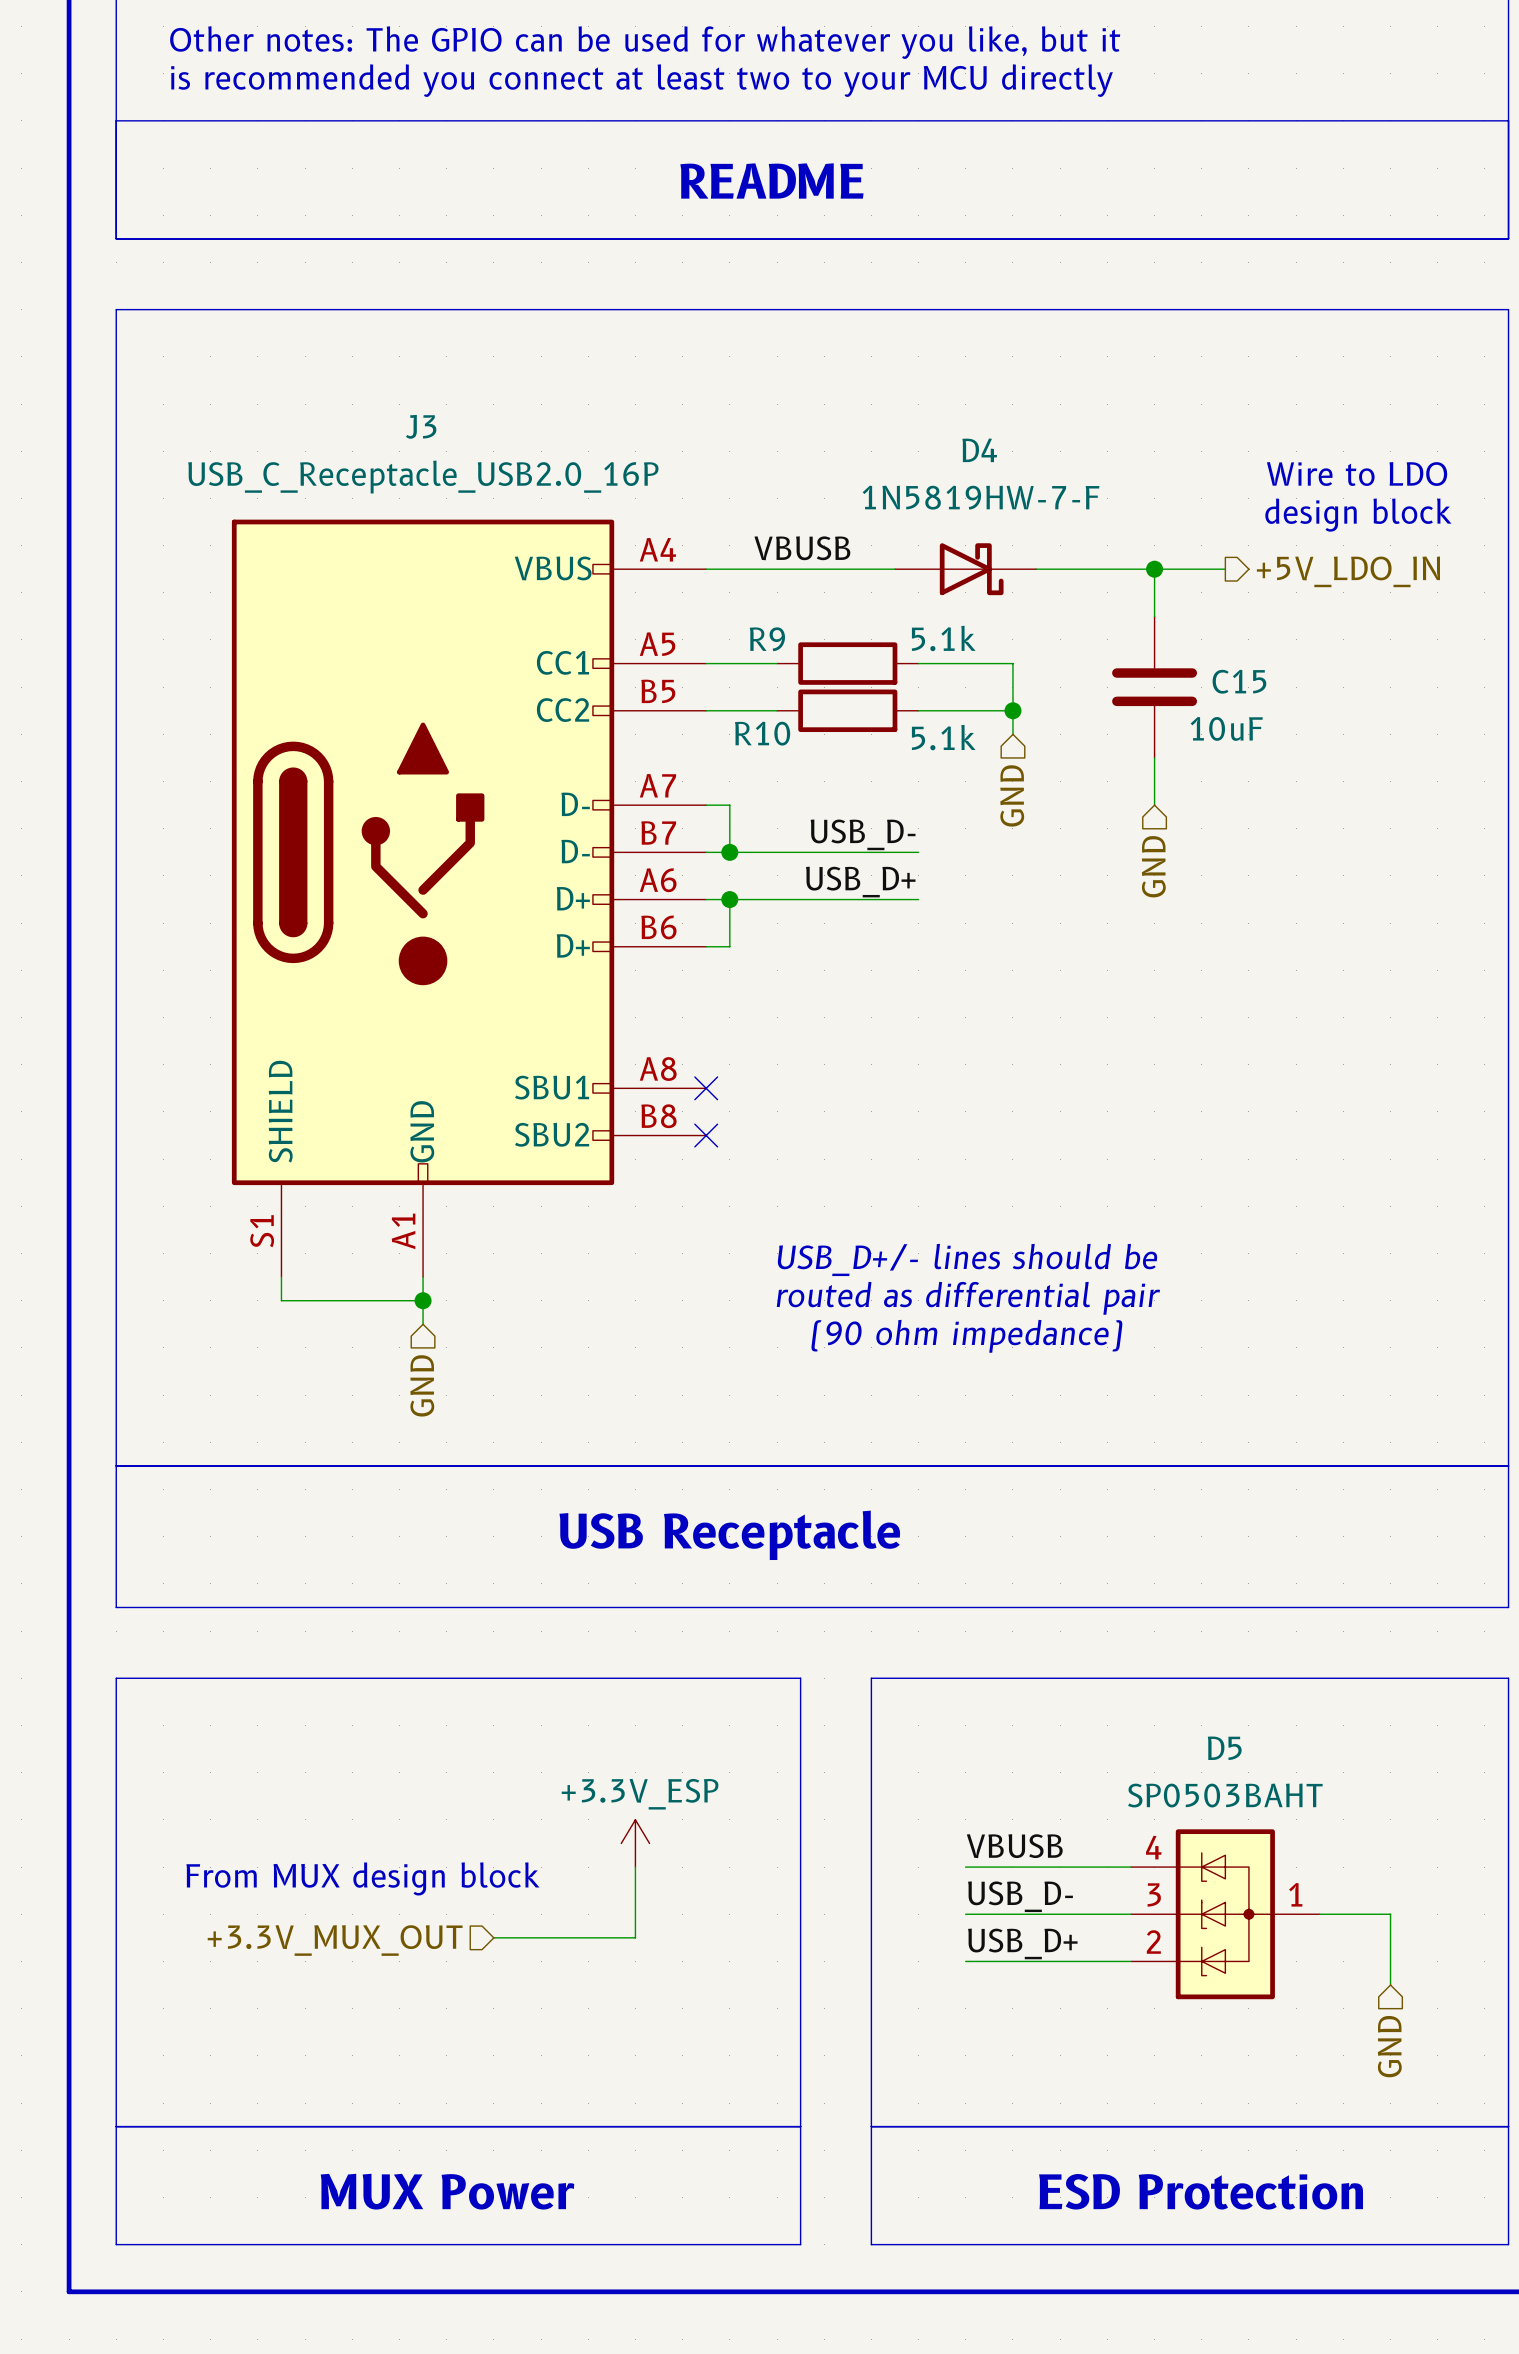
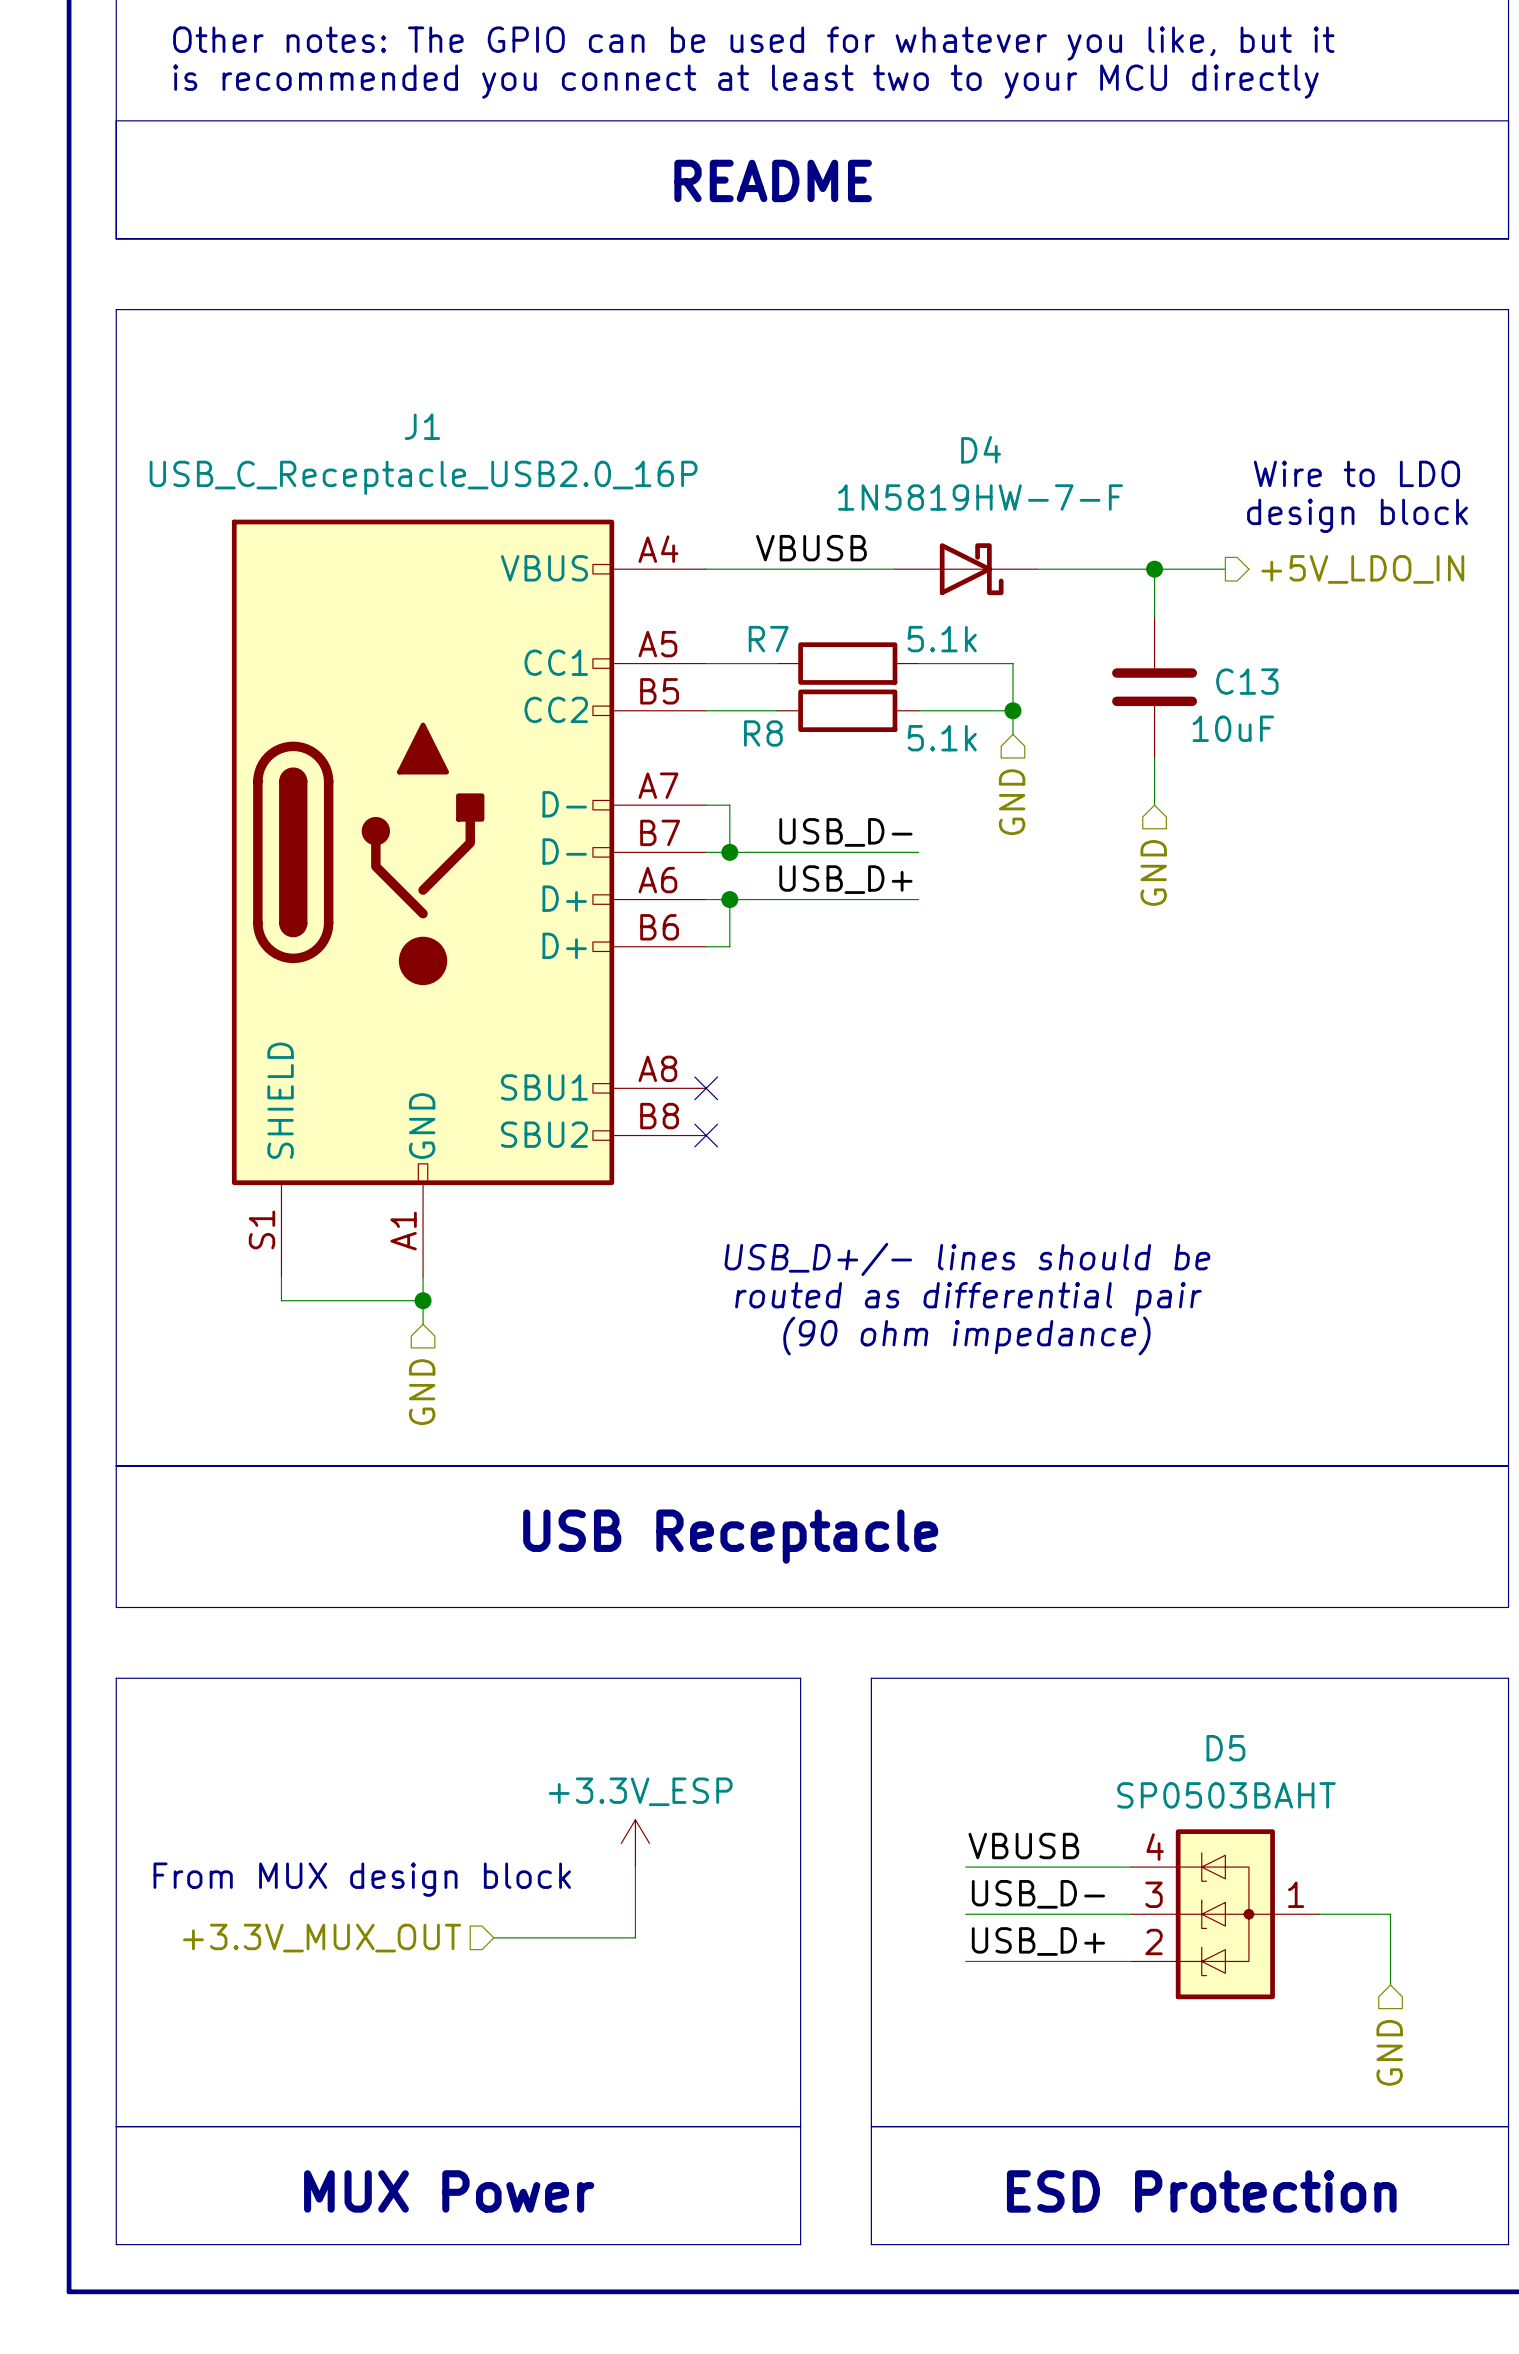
J3 name: J3 (421, 426) -> J1 (422, 426)
R9 name: R9 (767, 639) -> R7 (768, 639)
C15 name: C15 (1239, 681) -> C13 (1247, 681)
R10 name: R10 (762, 733) -> R8 (763, 733)

